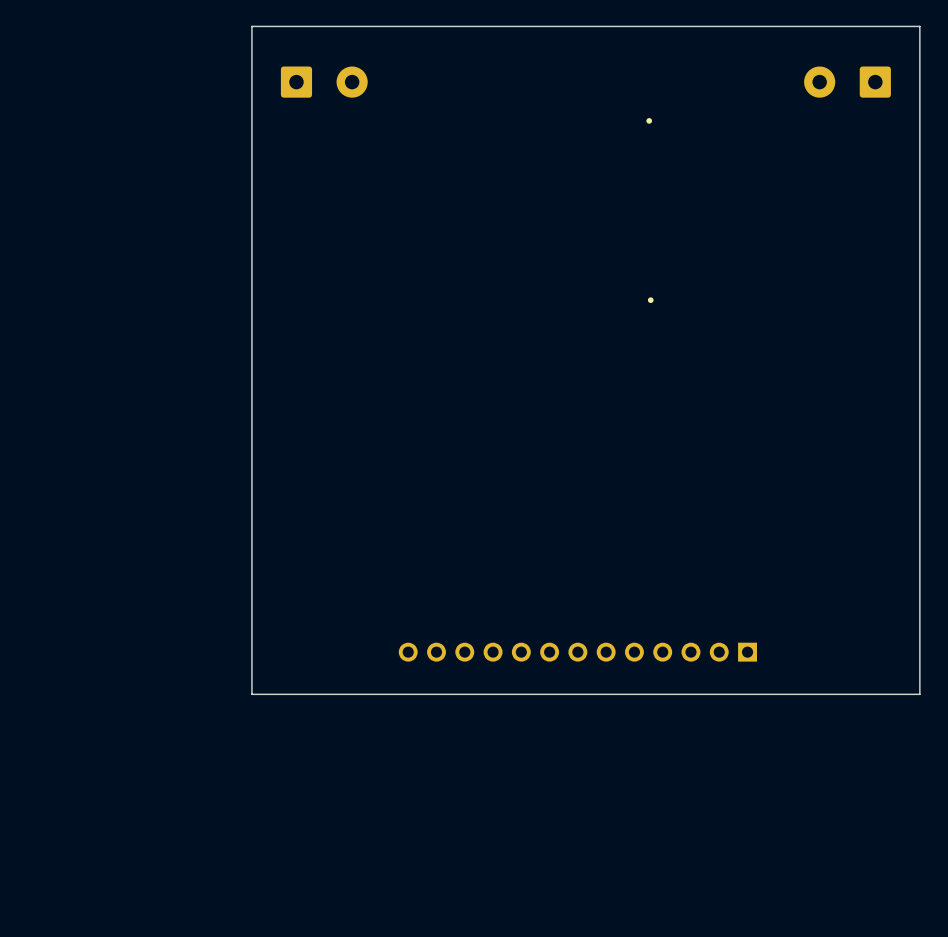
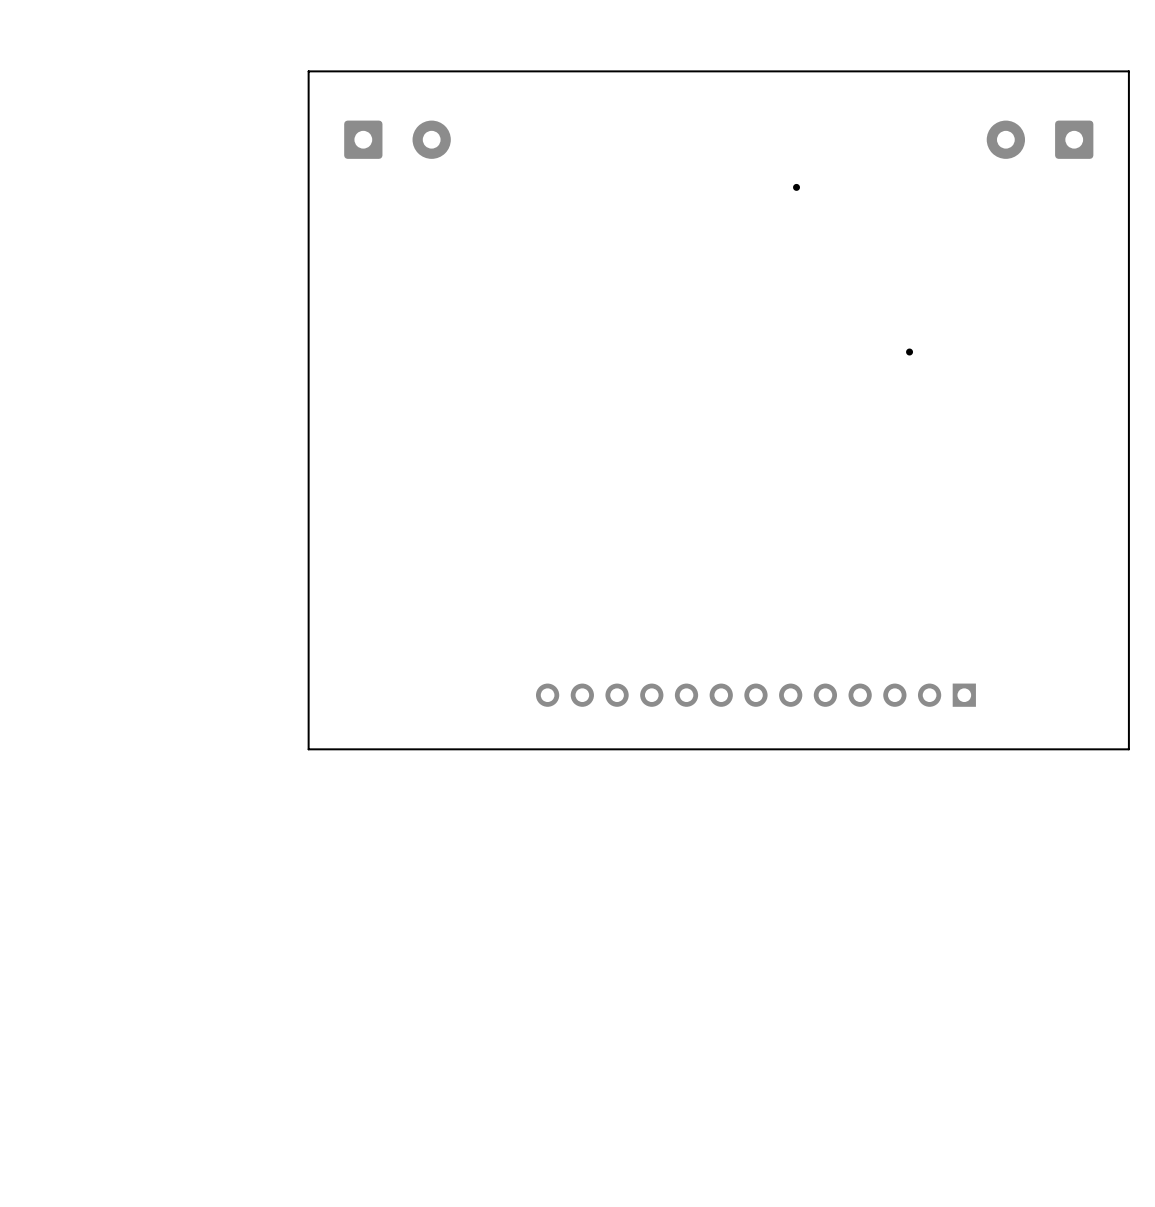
part position: (650, 300) -> (909, 352)
board edge: (919, 578) (919, 694) (251, 694) (251, 578) -> (1128, 749) (308, 749)
part position: (577, 652) -> (755, 695)

